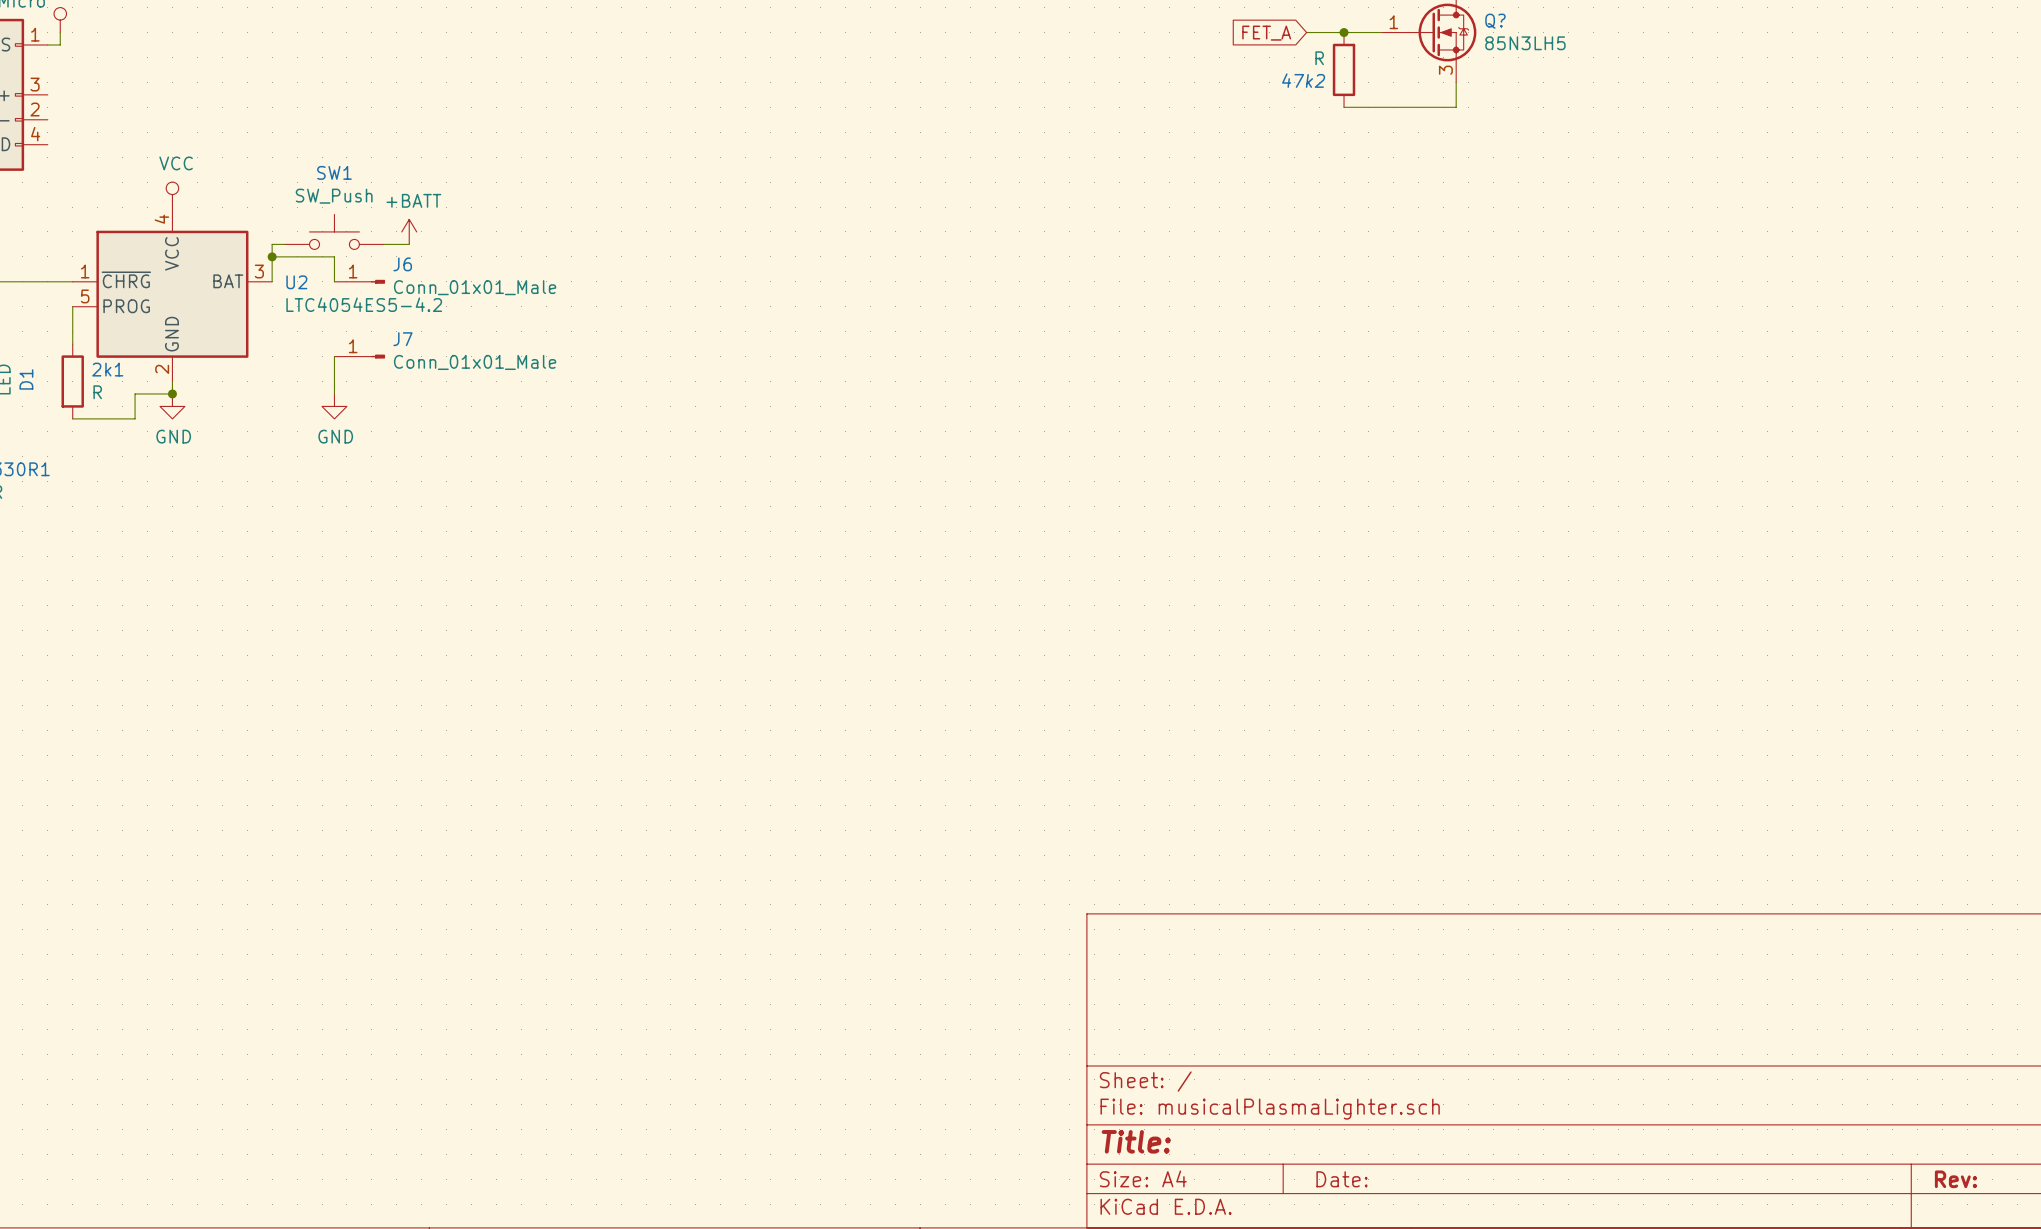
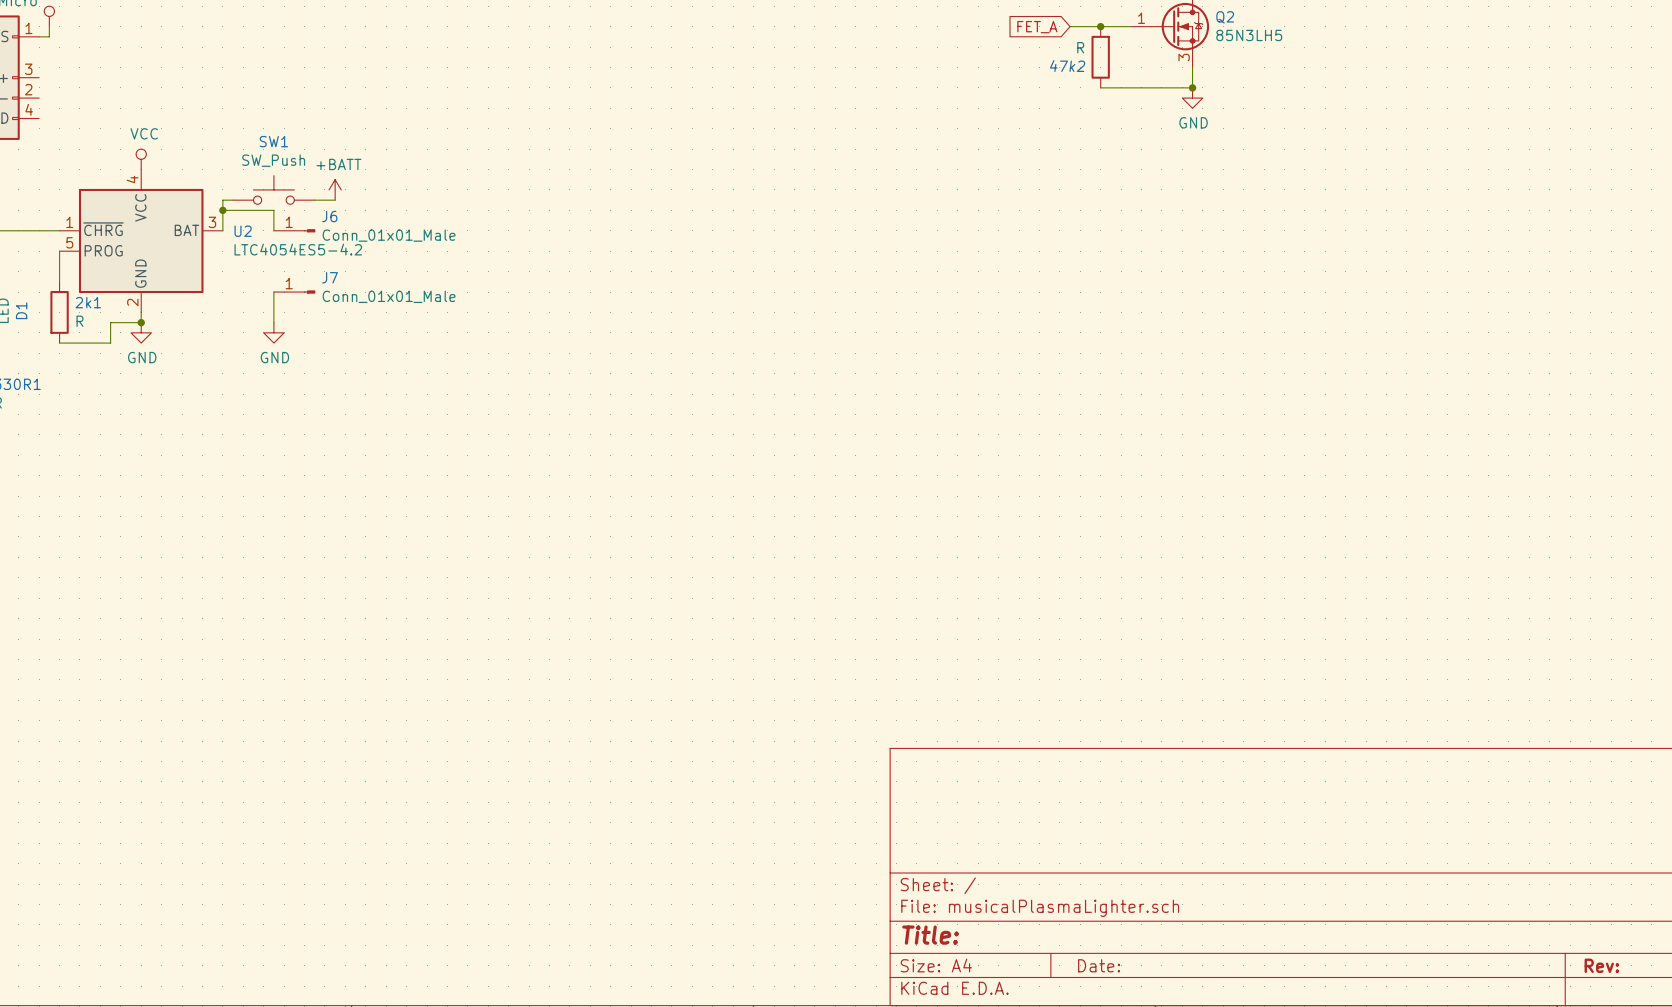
Q? name: Q? (1495, 21) -> Q2 (1225, 17)
junction: none -> (1192, 87)
power symbol: none -> GND (1192, 98)

